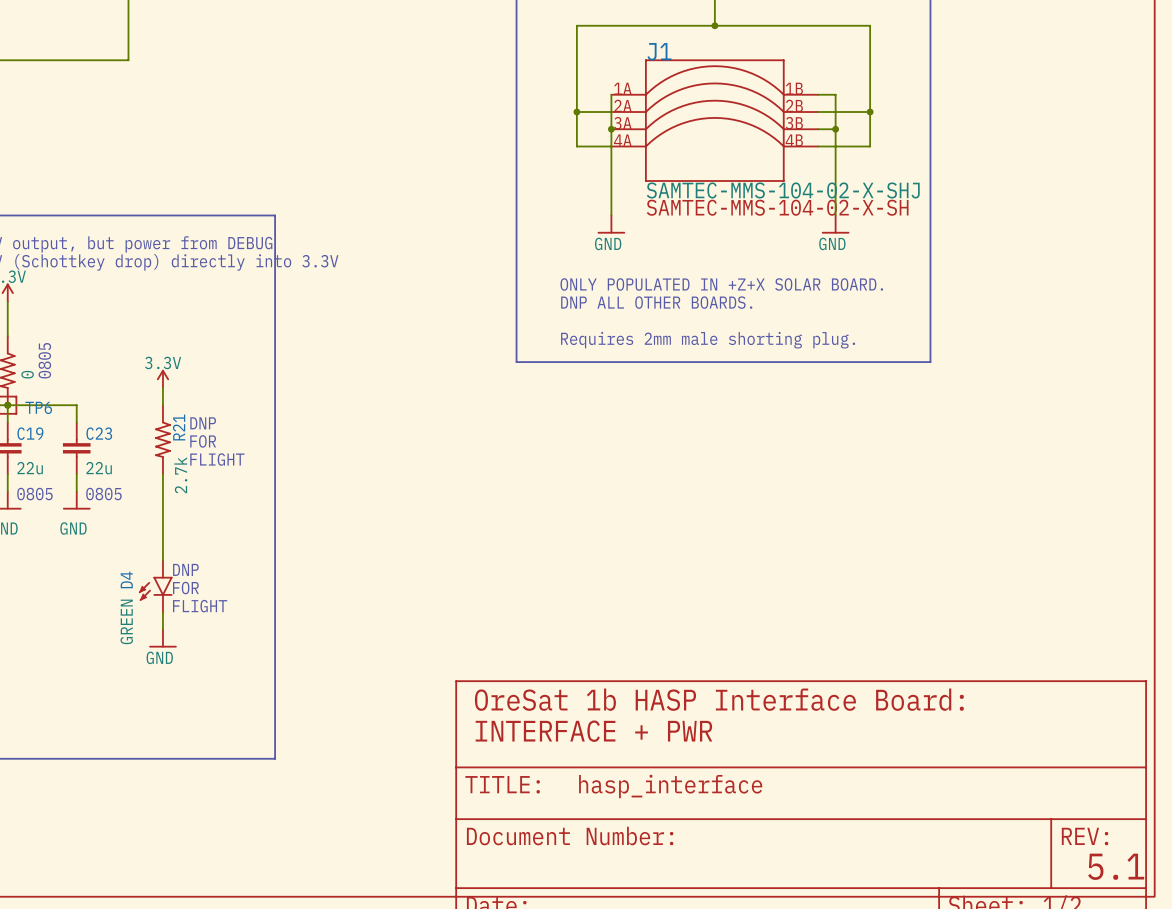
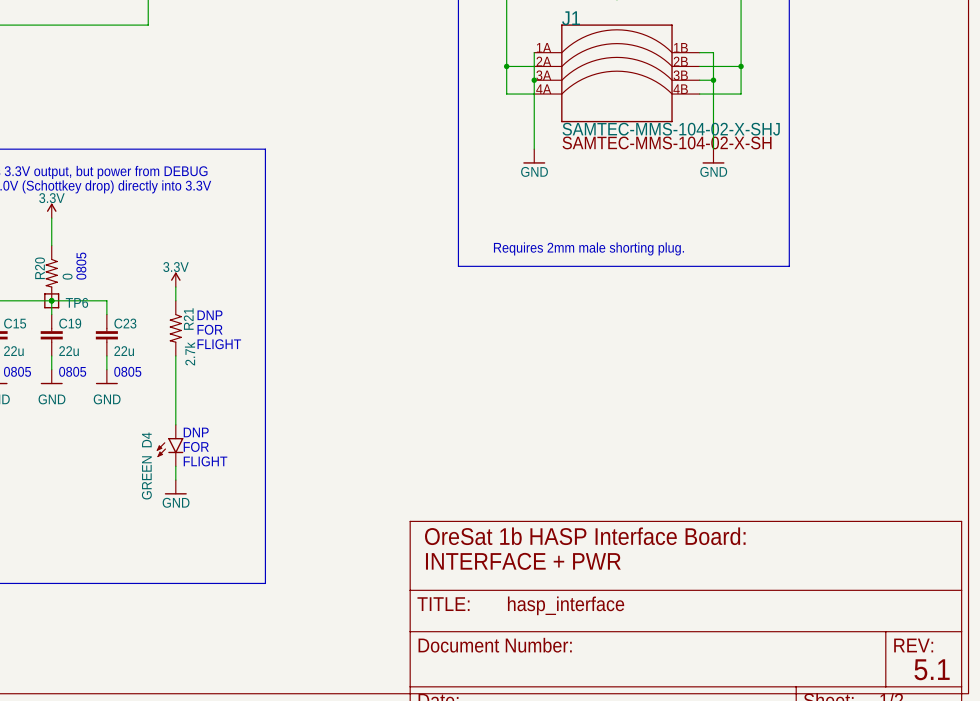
text: ONLY POPULATED IN +Z+X SOLAR BOARD. (721, 284) -> none
text: DNP ALL OTHER BOARDS. (656, 302) -> none

